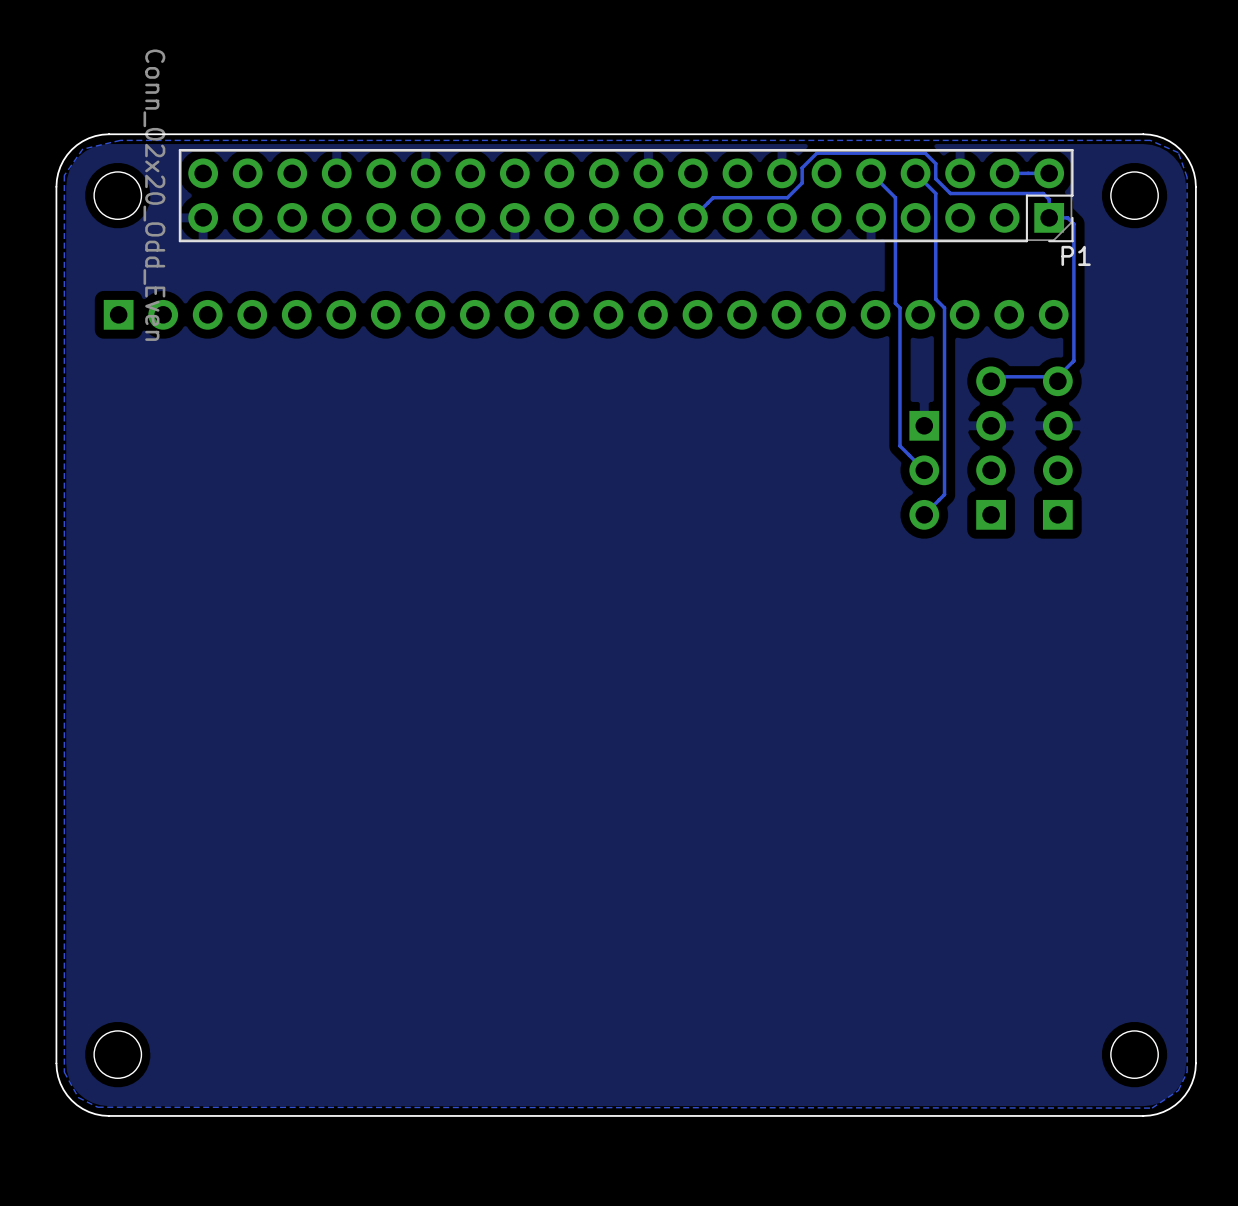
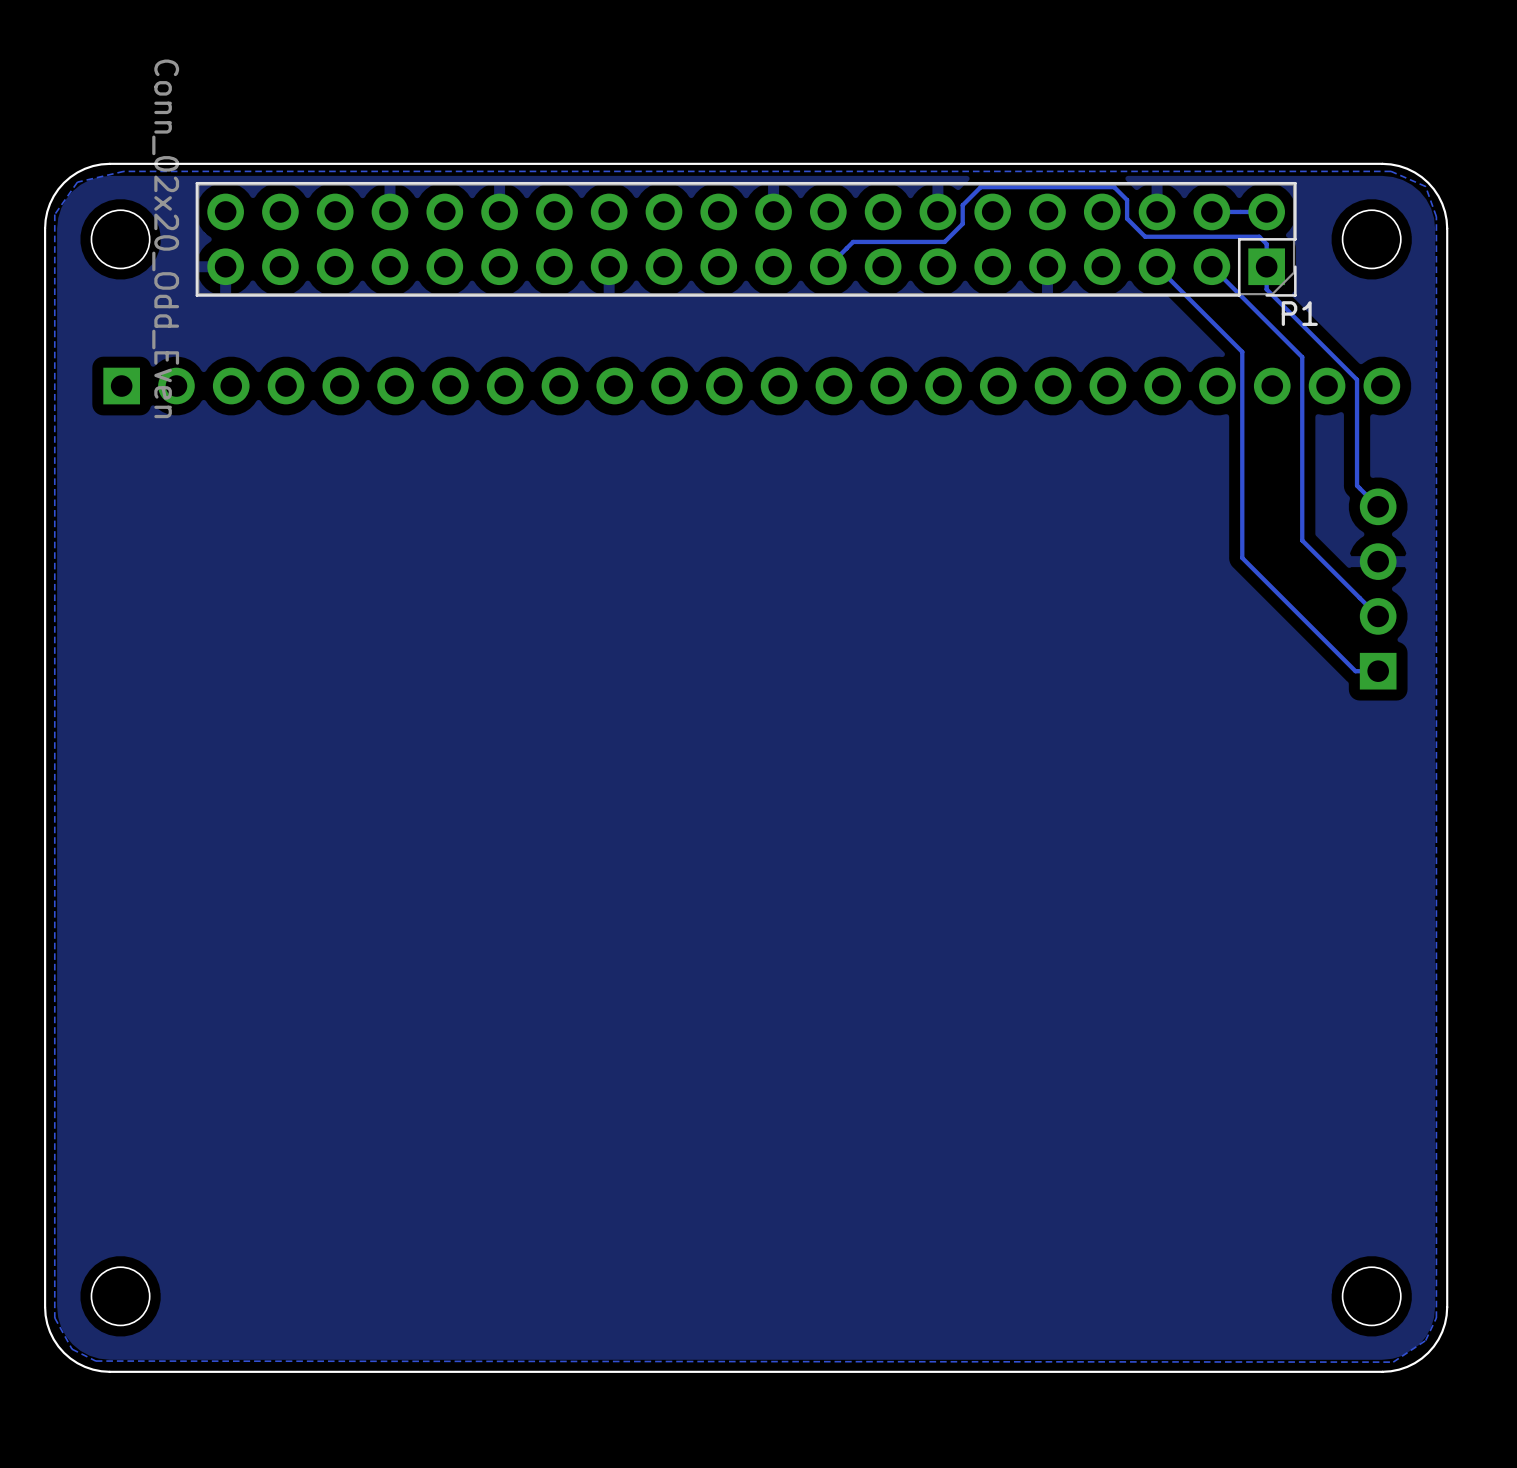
track: (871, 173) (895, 197) (895, 303) (899, 307) (899, 446) (924, 470) -> none
track: (915, 173) (935, 193) (935, 299) (944, 307) (944, 494) (924, 514) -> none
track: none -> (1157, 266) (1242, 351) (1242, 557) (1355, 671) (1378, 671)
track: none -> (1211, 266) (1302, 357) (1302, 540) (1378, 616)
track: (1049, 217) (1067, 217) (1073, 224) (1073, 360) (1057, 376) (1004, 376) -> (1266, 266) (1266, 289) (1357, 379) (1357, 485) (1378, 506)
part: none -> (751, 386)
part: (991, 448) -> none
part: (1057, 448) -> none
part: (924, 470) -> none
part: none -> (1378, 589)

